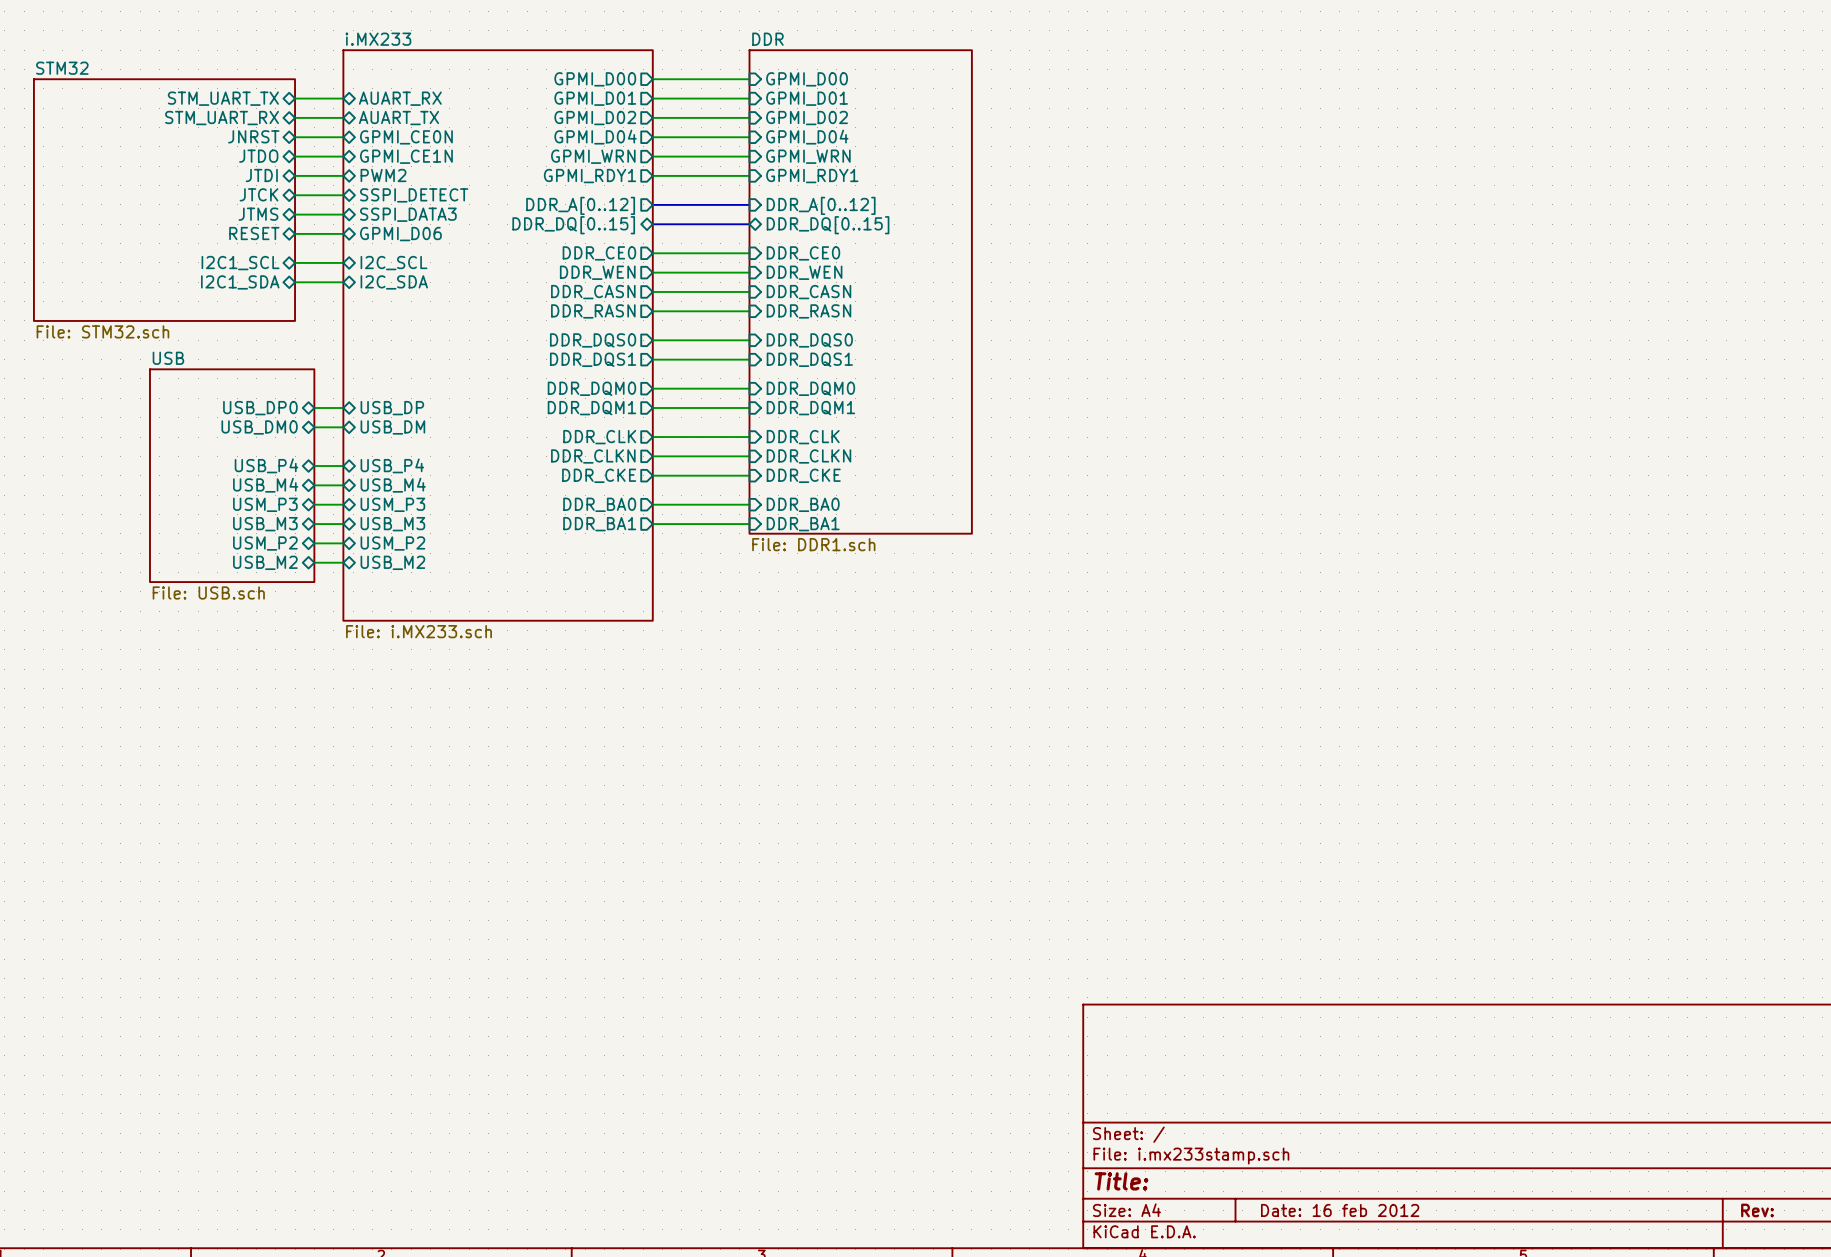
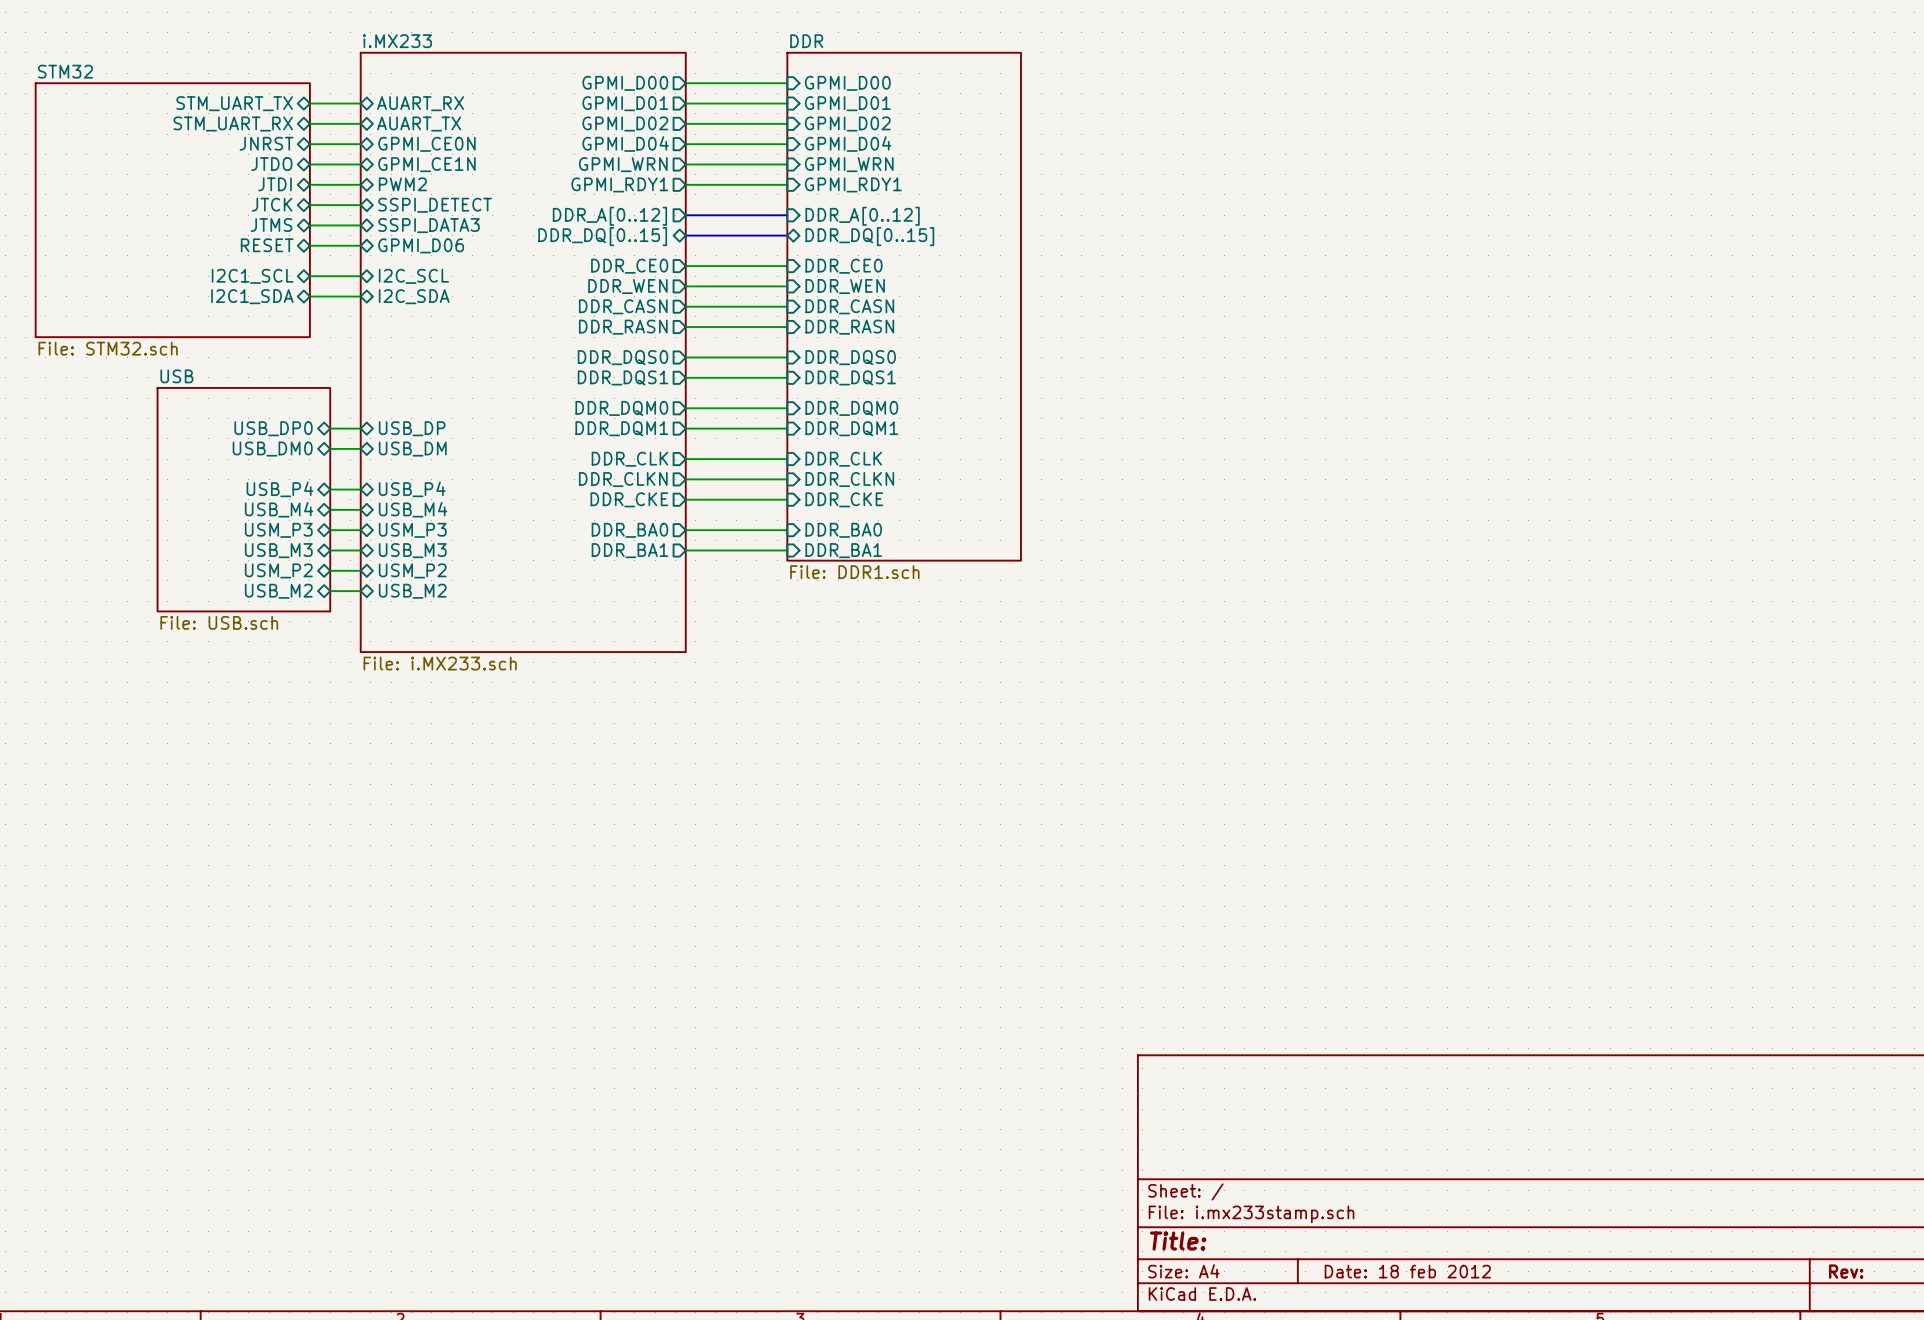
title block: Date: 16 feb 2012 (1340, 1210) -> Date: 18 feb 2012 (1407, 1271)

